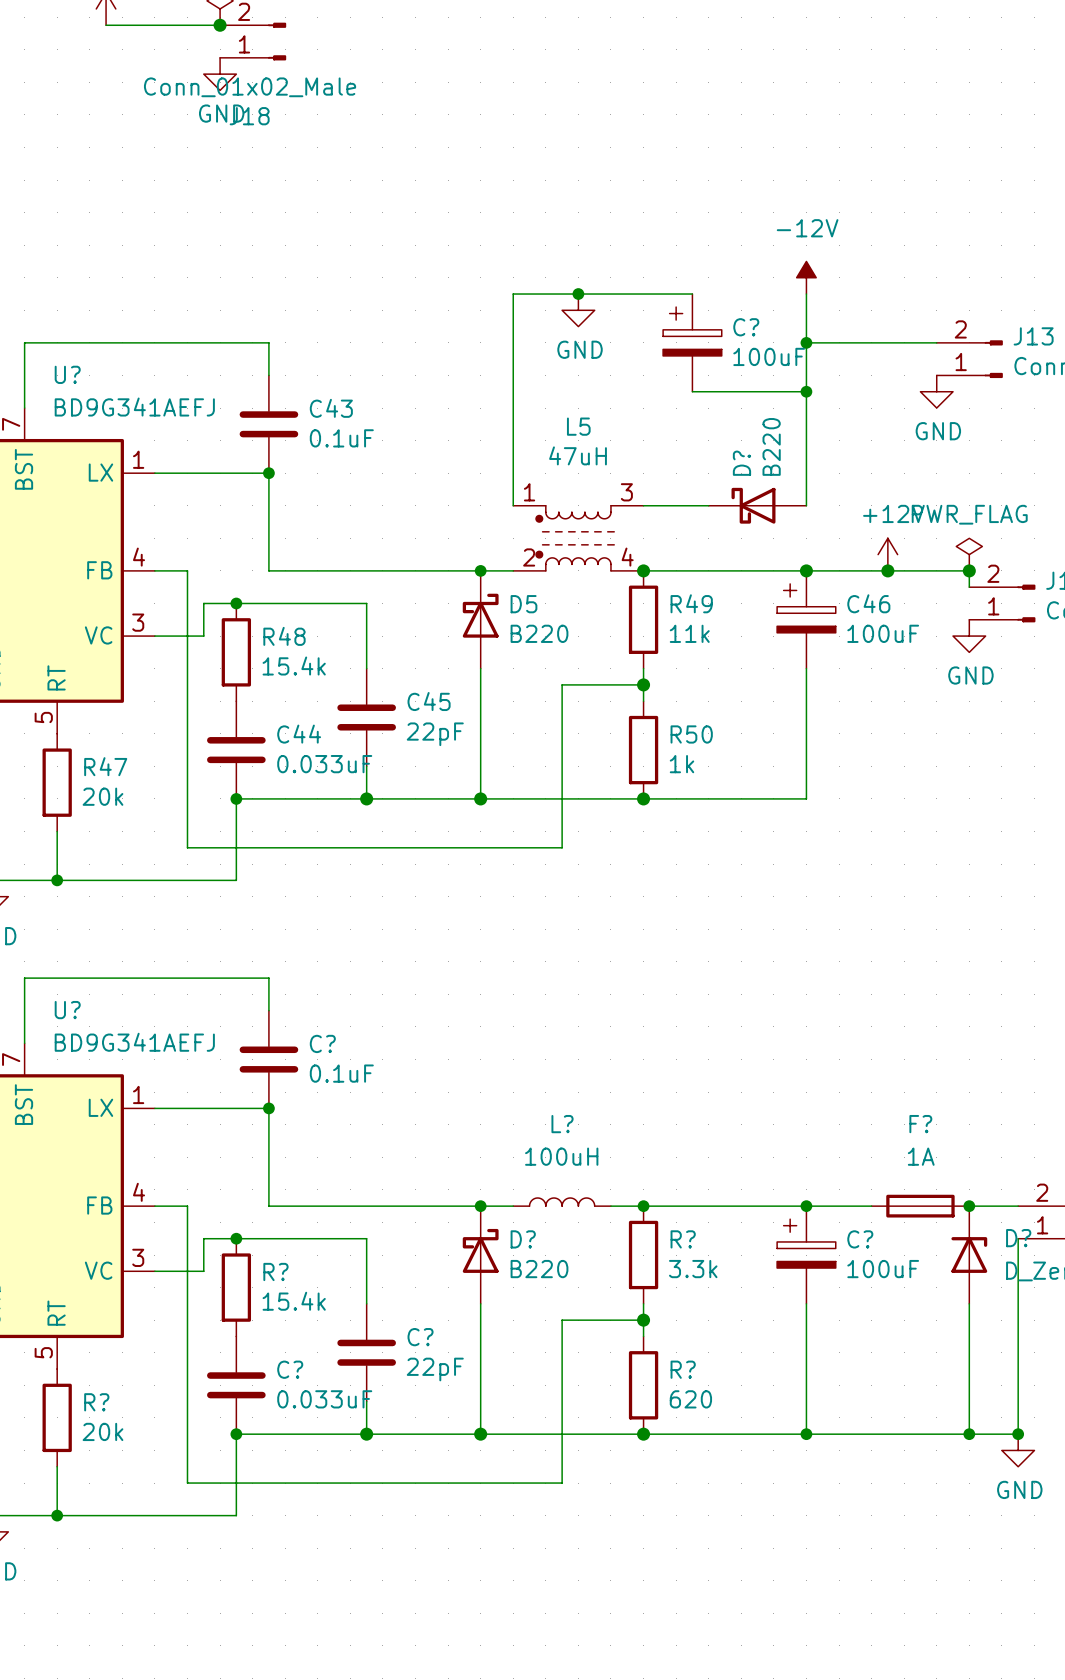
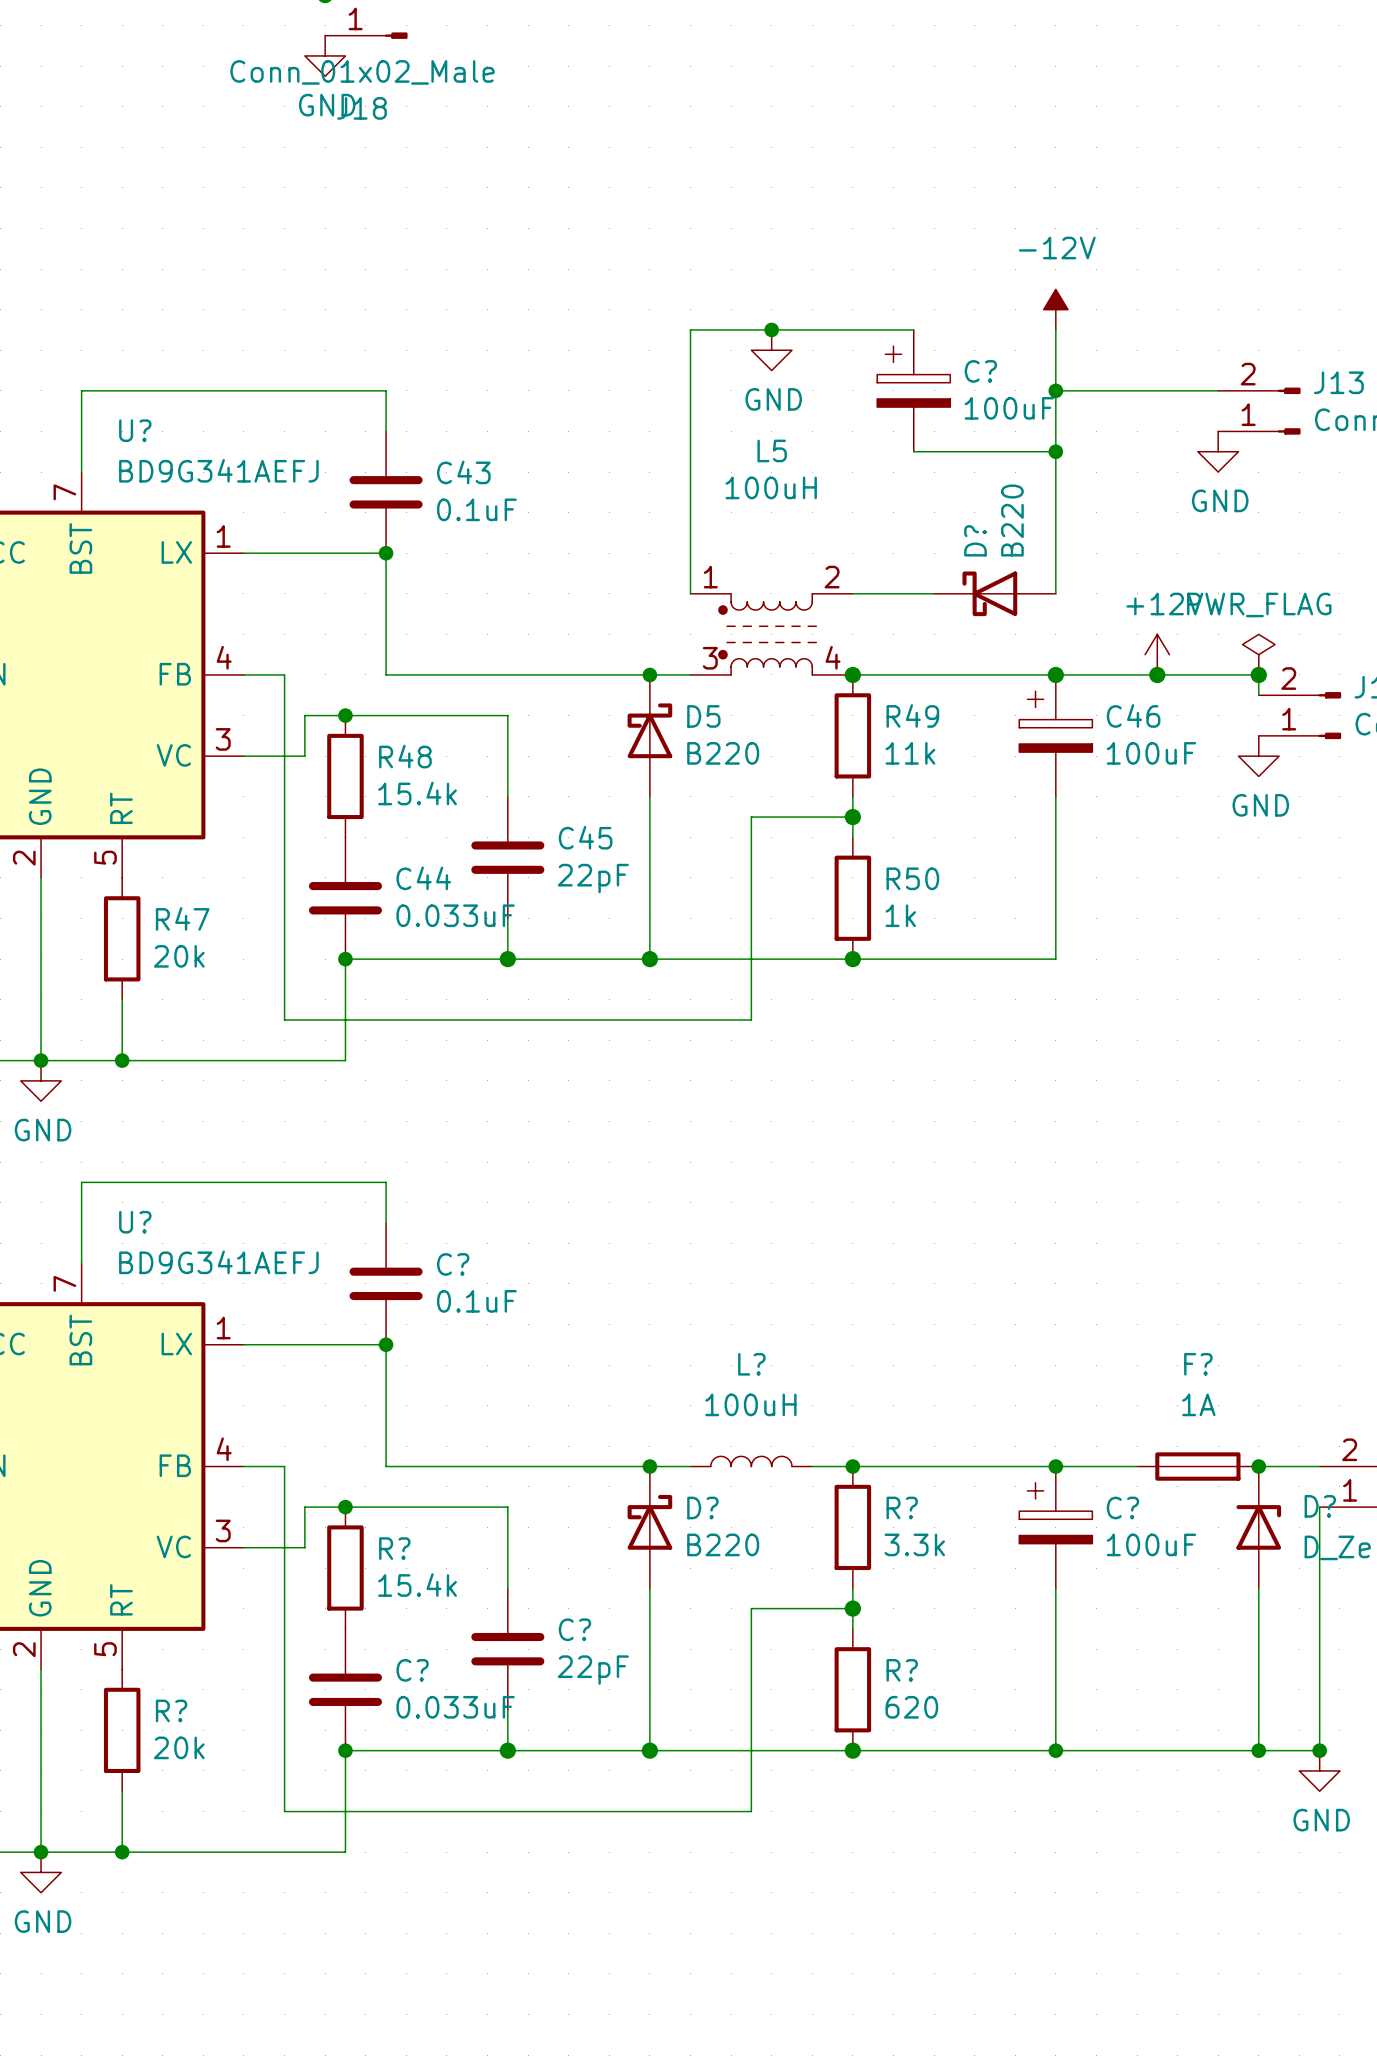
L5 name position: L5 (578, 426) -> L5 (772, 450)
L5 value: 47uH (578, 455) -> 100uH (771, 487)
L5 pin number: 3 (626, 492) -> 2 (832, 577)
L5 pin number: 2 (529, 557) -> 3 (710, 658)

